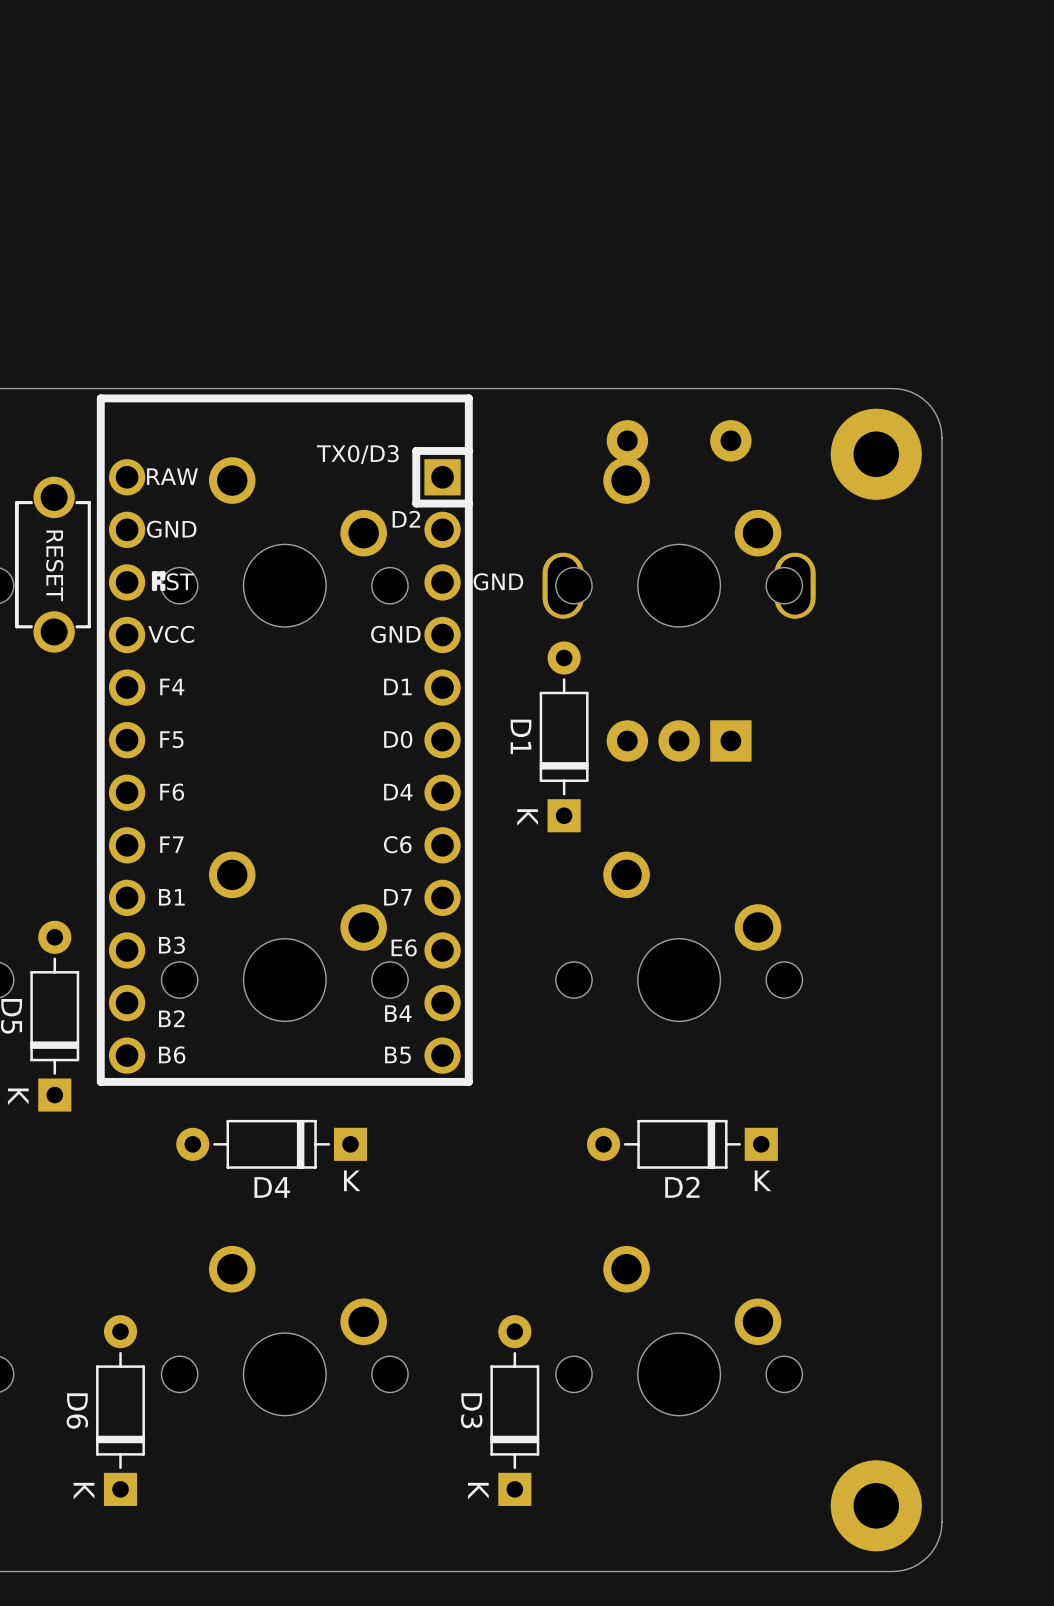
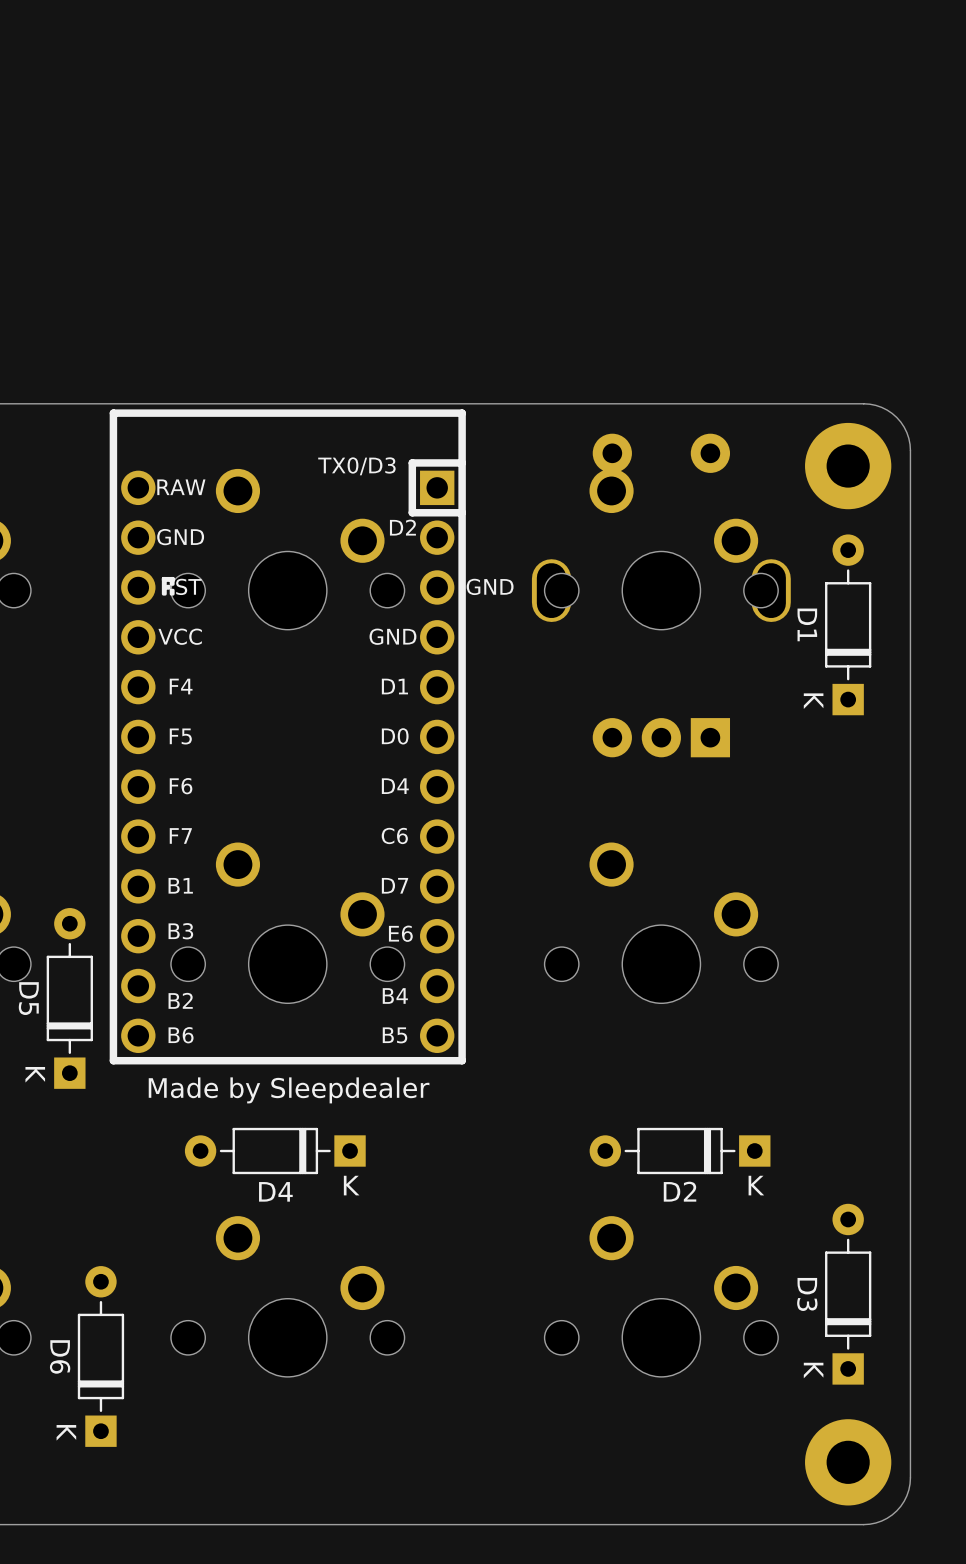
part: (53, 564) -> none
D1 position: (564, 736) -> (848, 624)
text: none -> Made by Sleepdealer (289, 1090)
D4 position: (271, 1144) -> (275, 1151)
D2 position: (682, 1144) -> (680, 1151)
D6 position: (120, 1410) -> (100, 1356)
D3 position: (514, 1410) -> (848, 1294)

